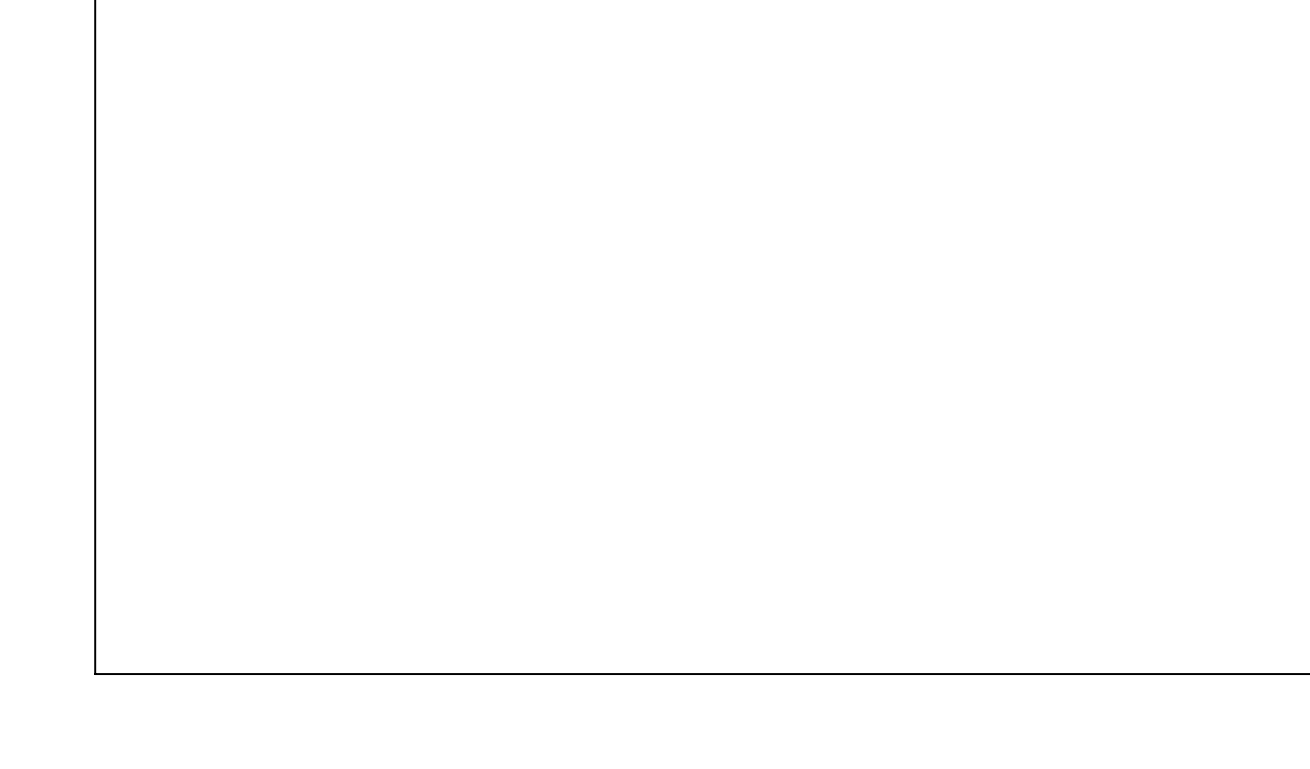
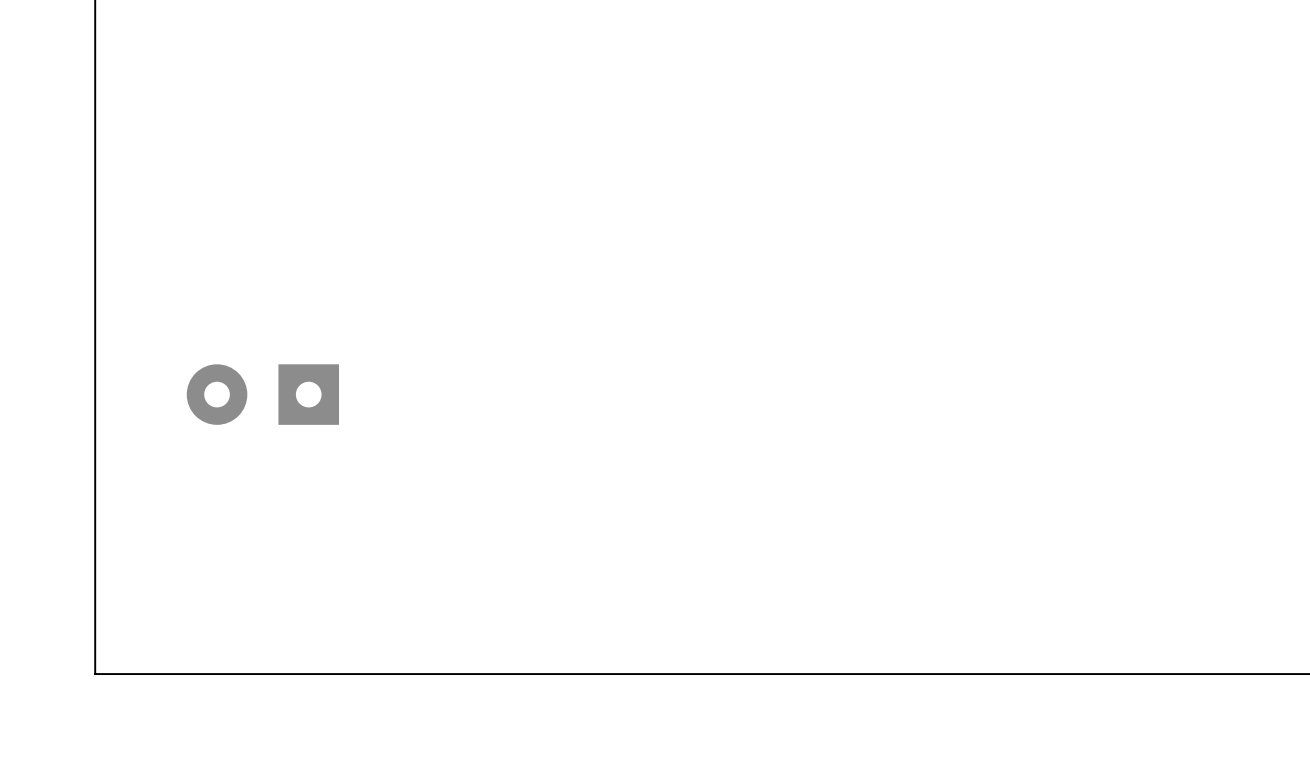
part: none -> (262, 394)

